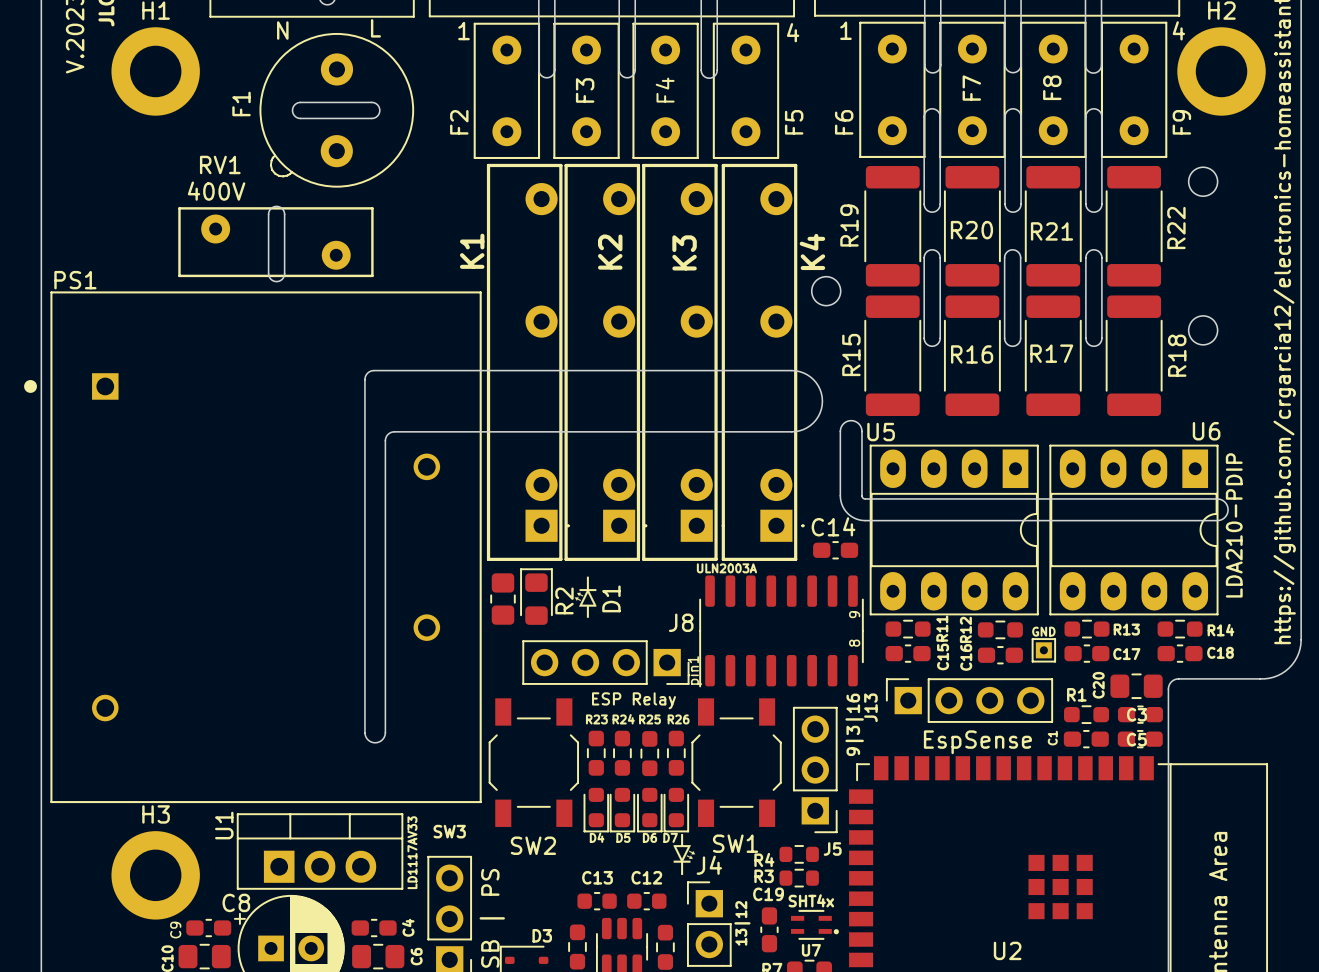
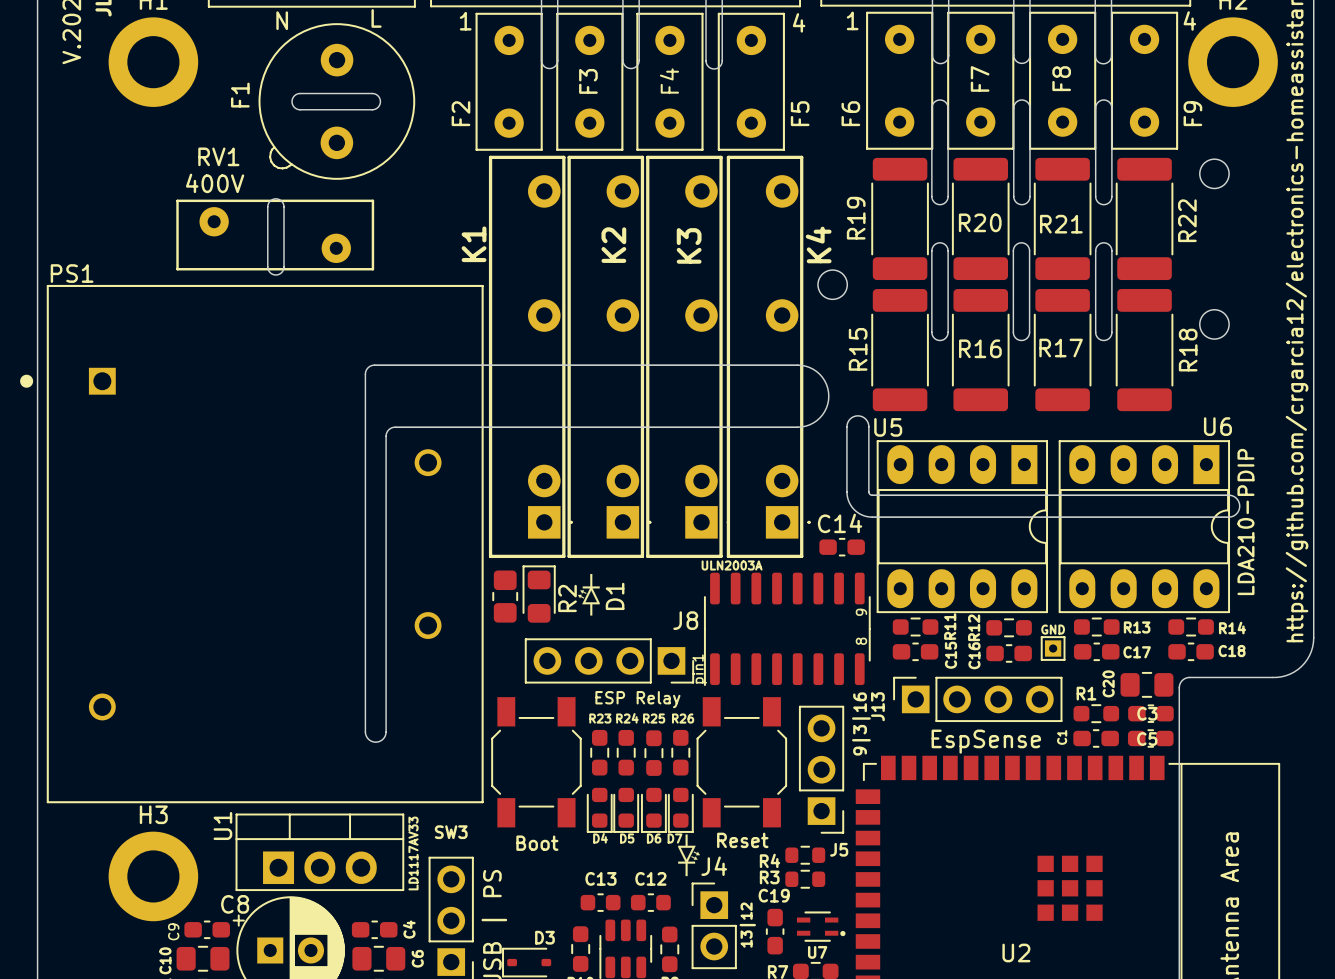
SW2: (533, 762) -> none
part: none -> (536, 762)
SW1: (736, 762) -> none
part: none -> (741, 762)
U7 value: SHT4x (811, 900) -> none

